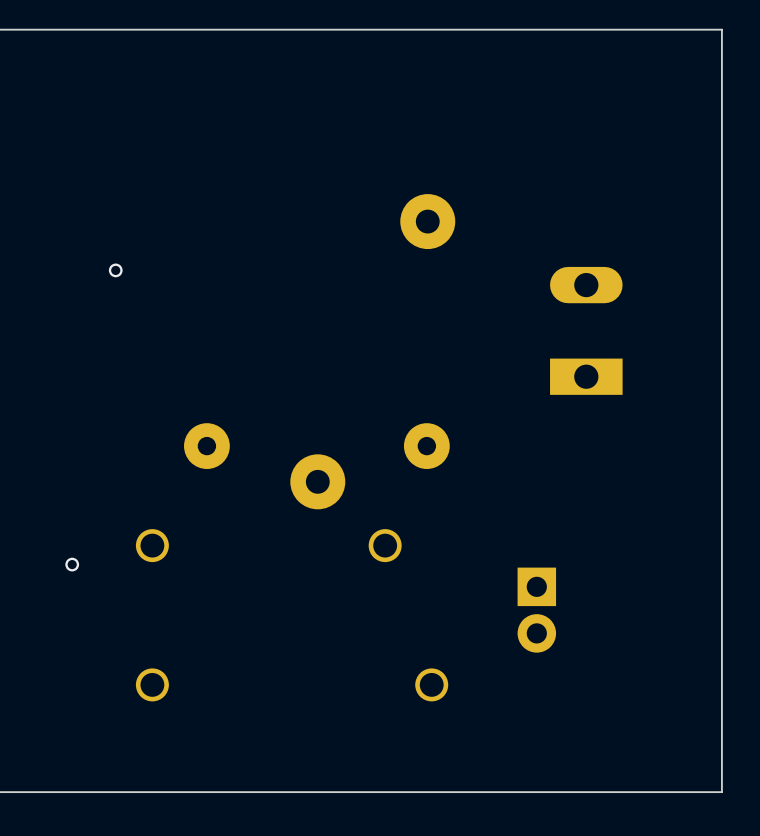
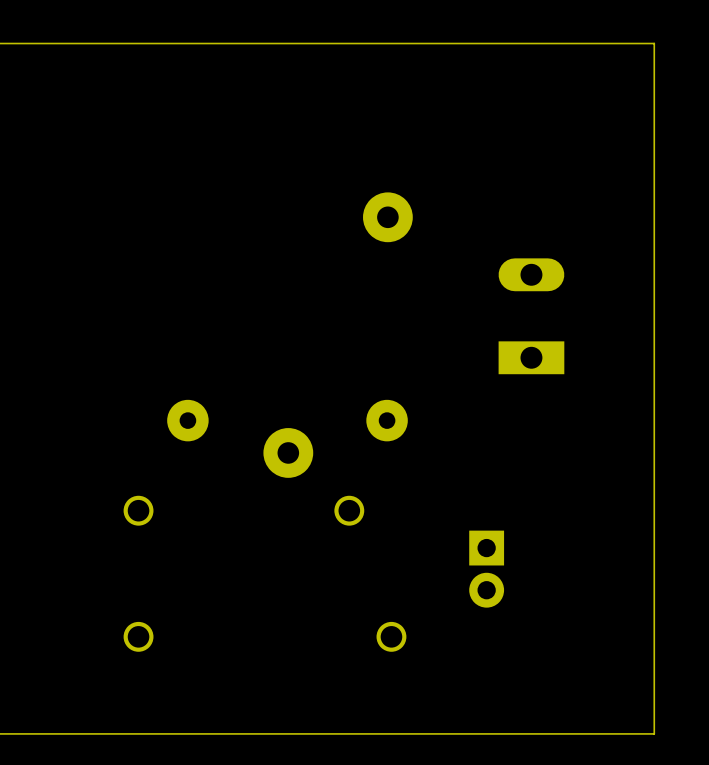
via: (115, 270) -> none
via: (72, 564) -> none

